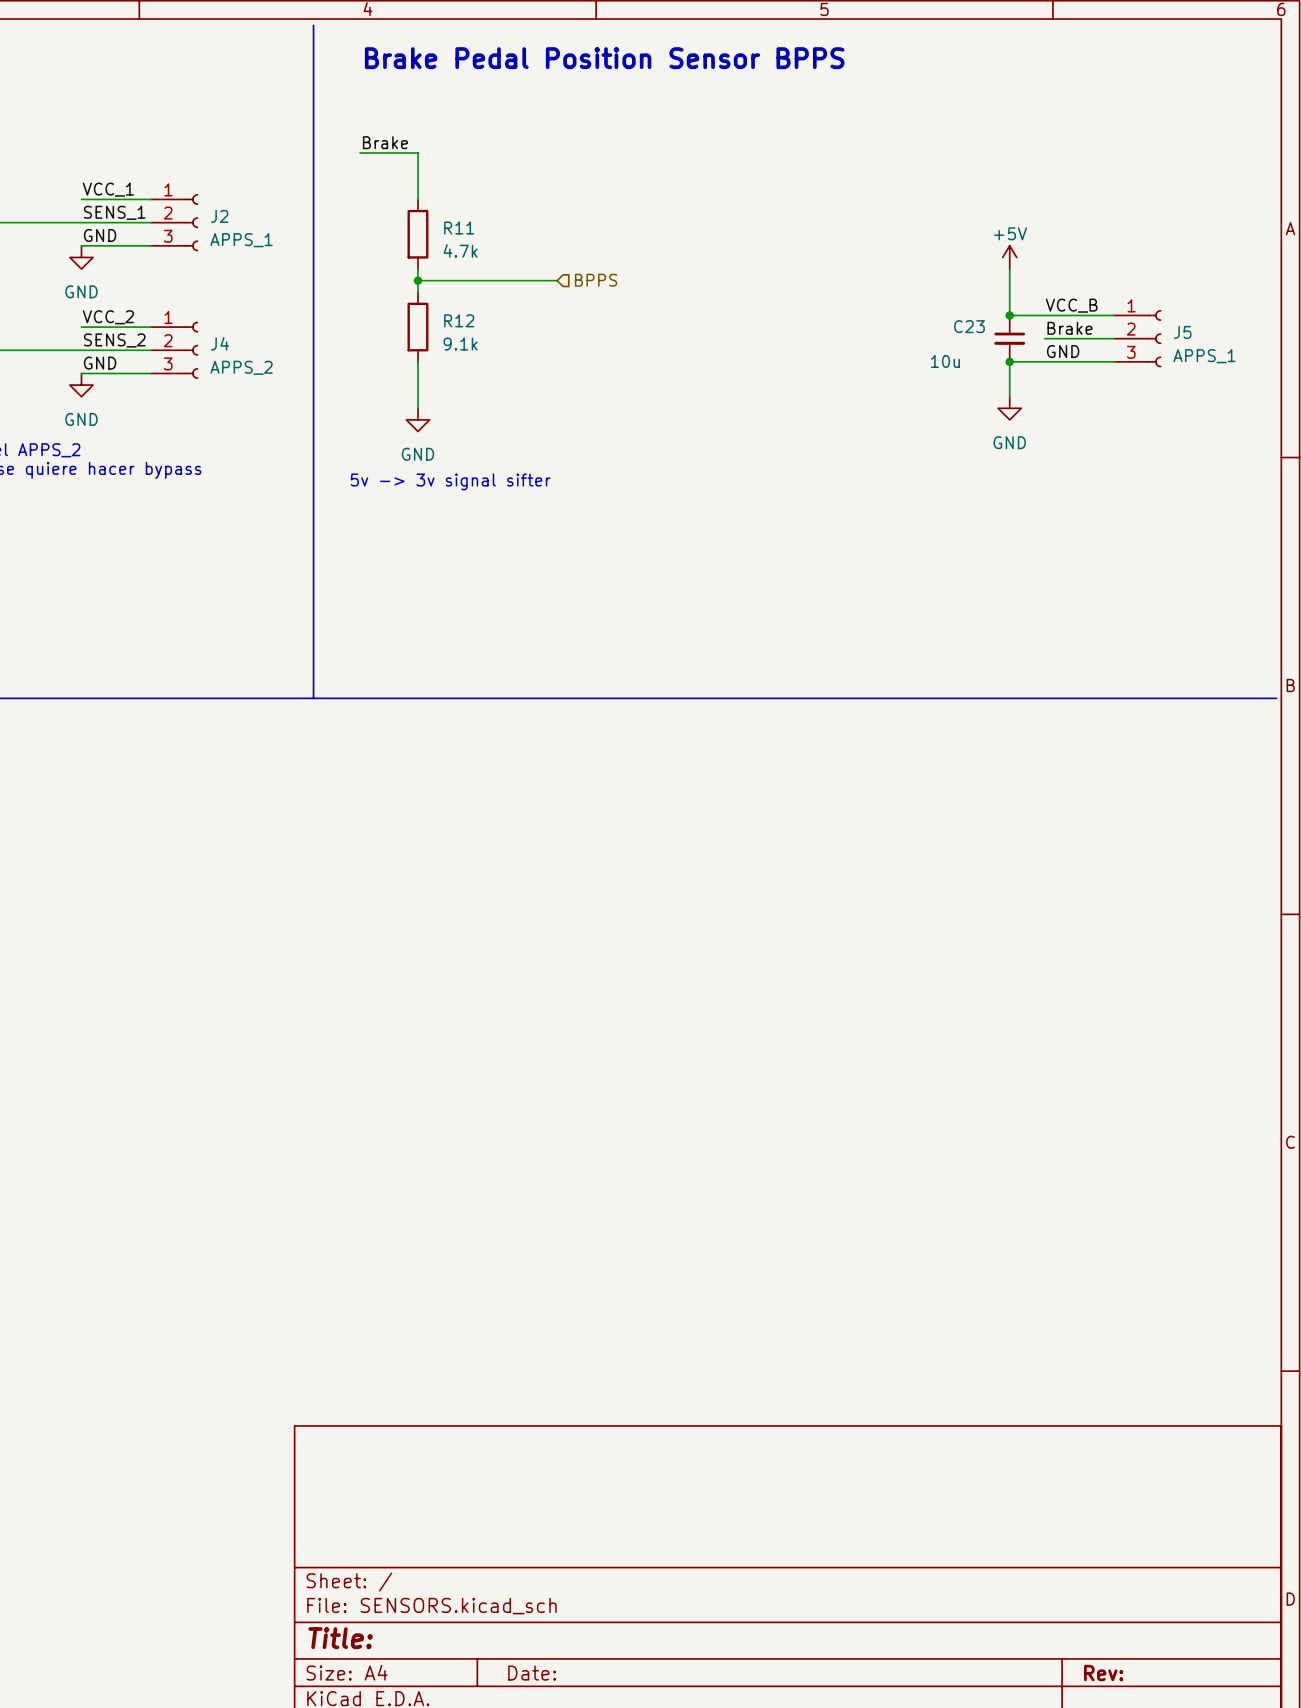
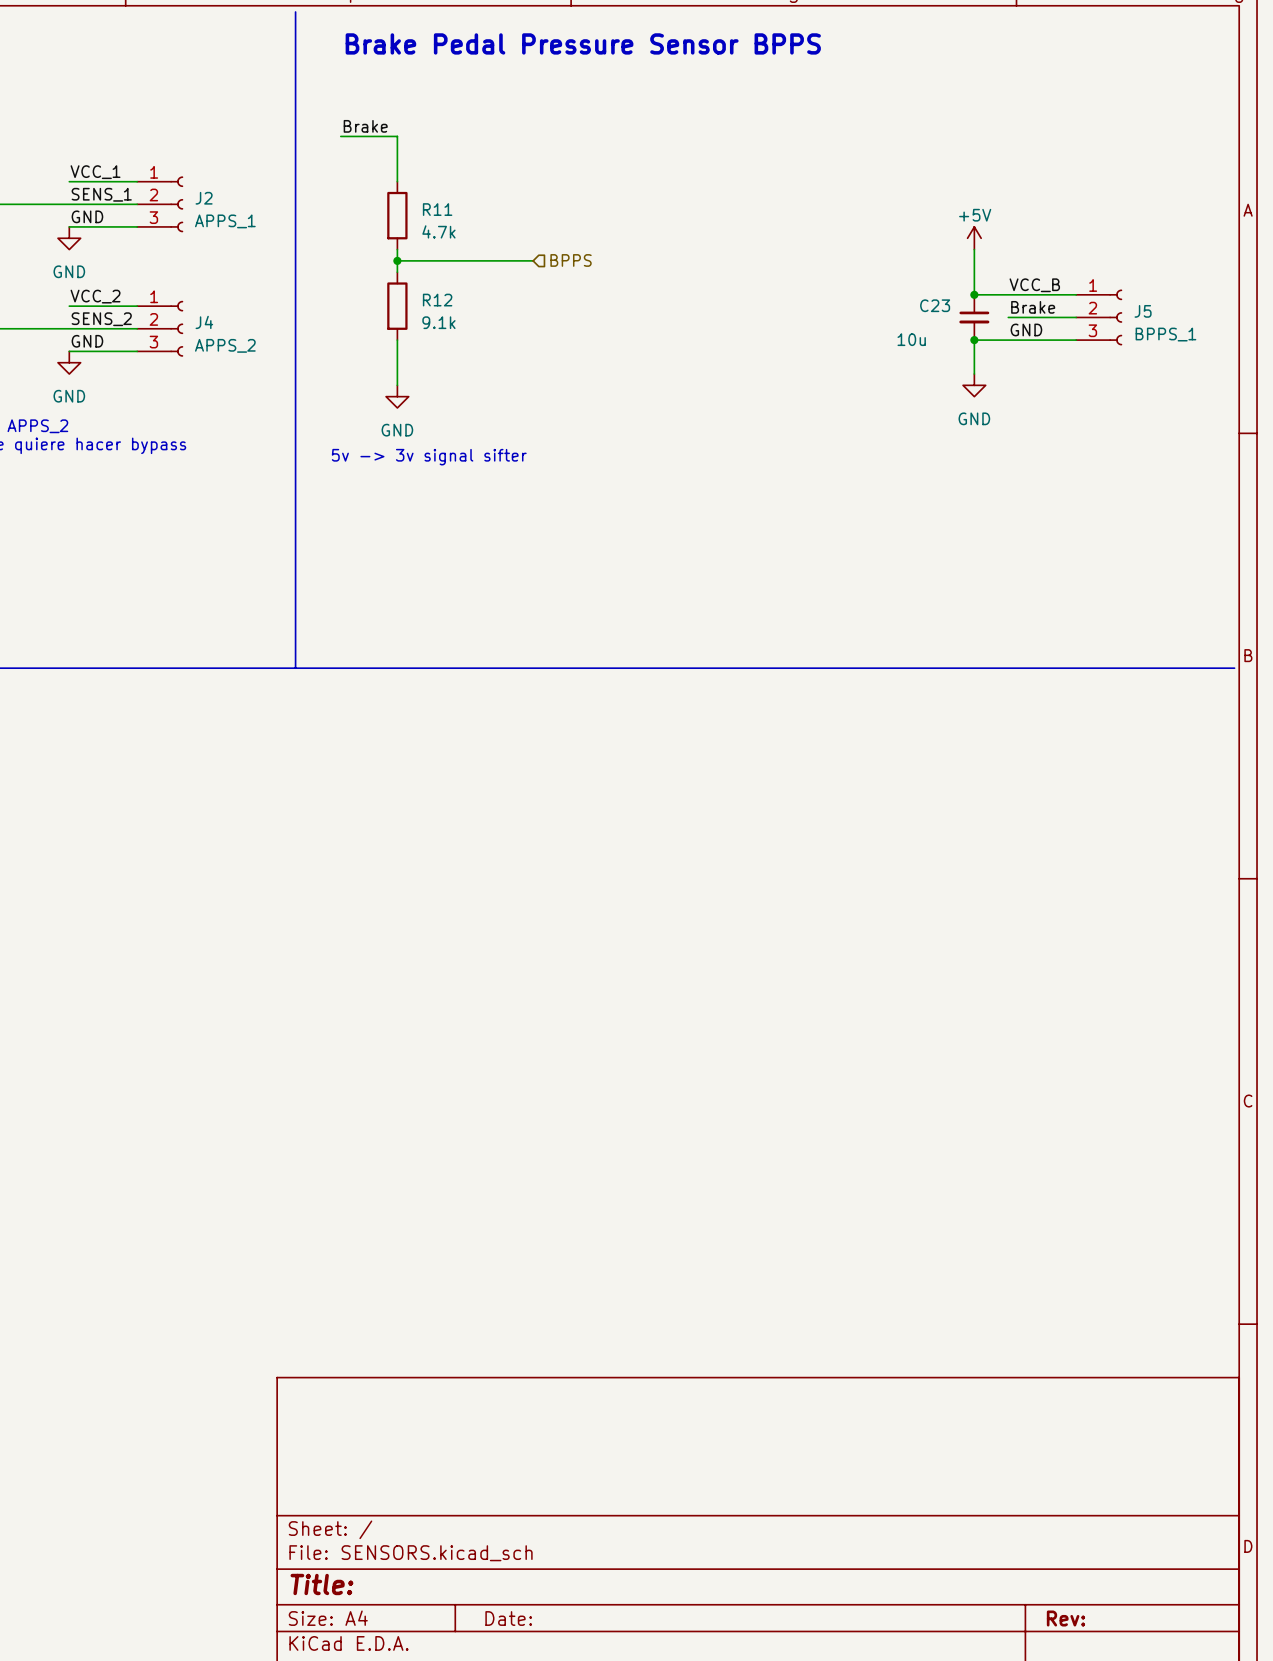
text: Brake Pedal Position Sensor BPPS (604, 58) -> Brake Pedal Pressure Sensor BPPS (583, 43)
J5 value: APPS_1 (1204, 356) -> BPPS_1 (1165, 334)

